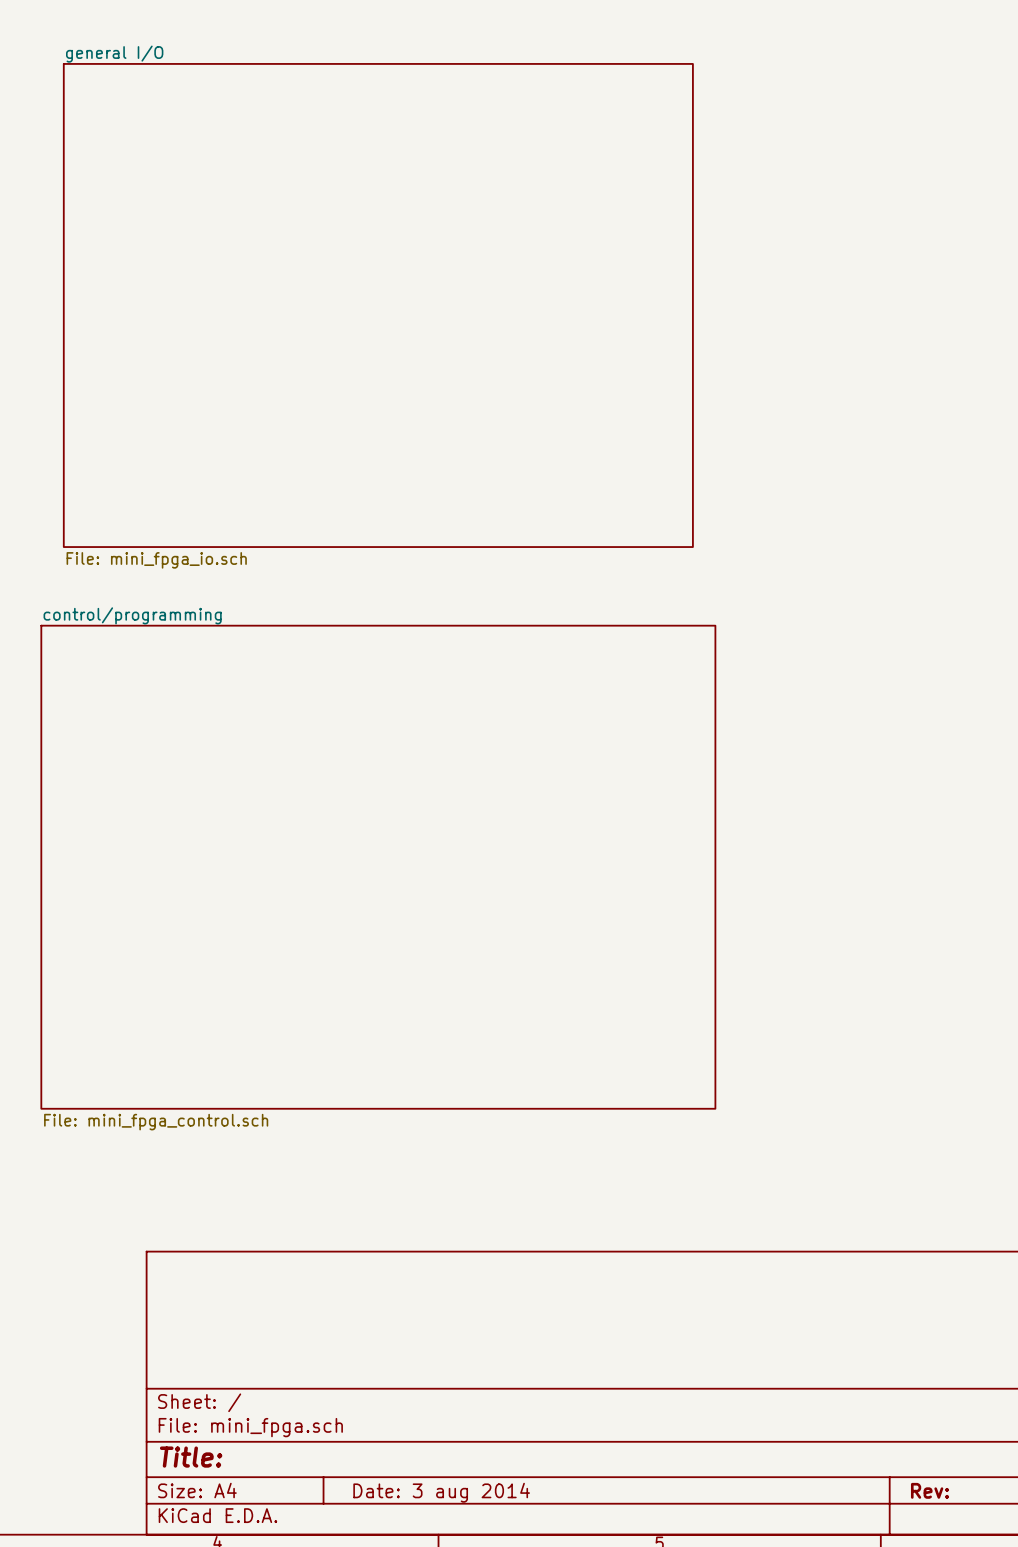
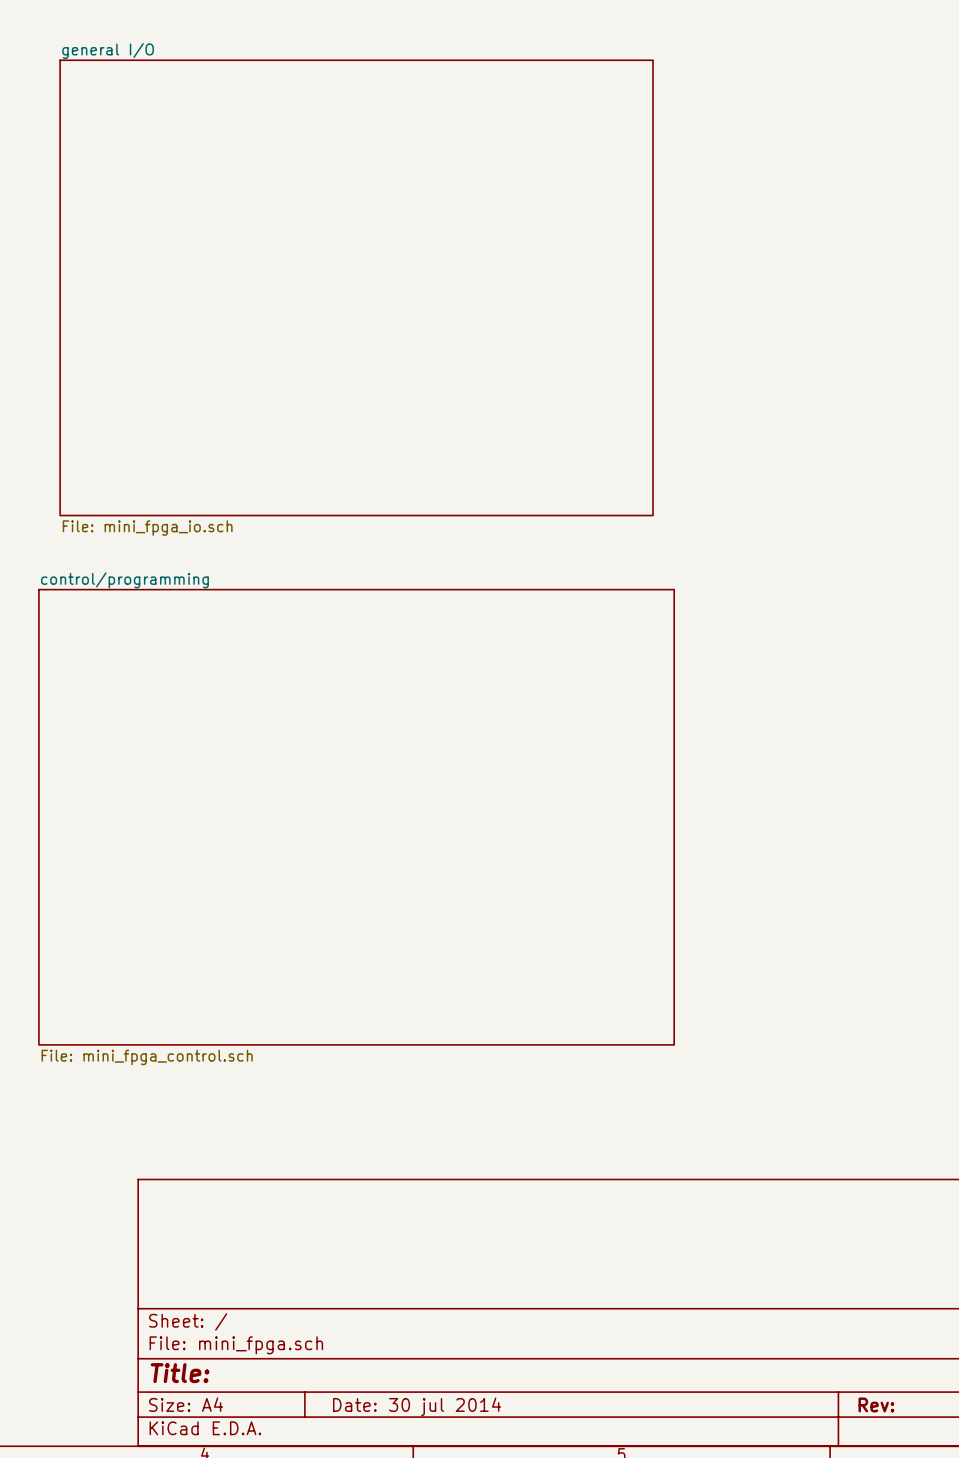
title block: Date: 3 aug 2014 (441, 1492) -> Date: 30 jul 2014 (417, 1406)

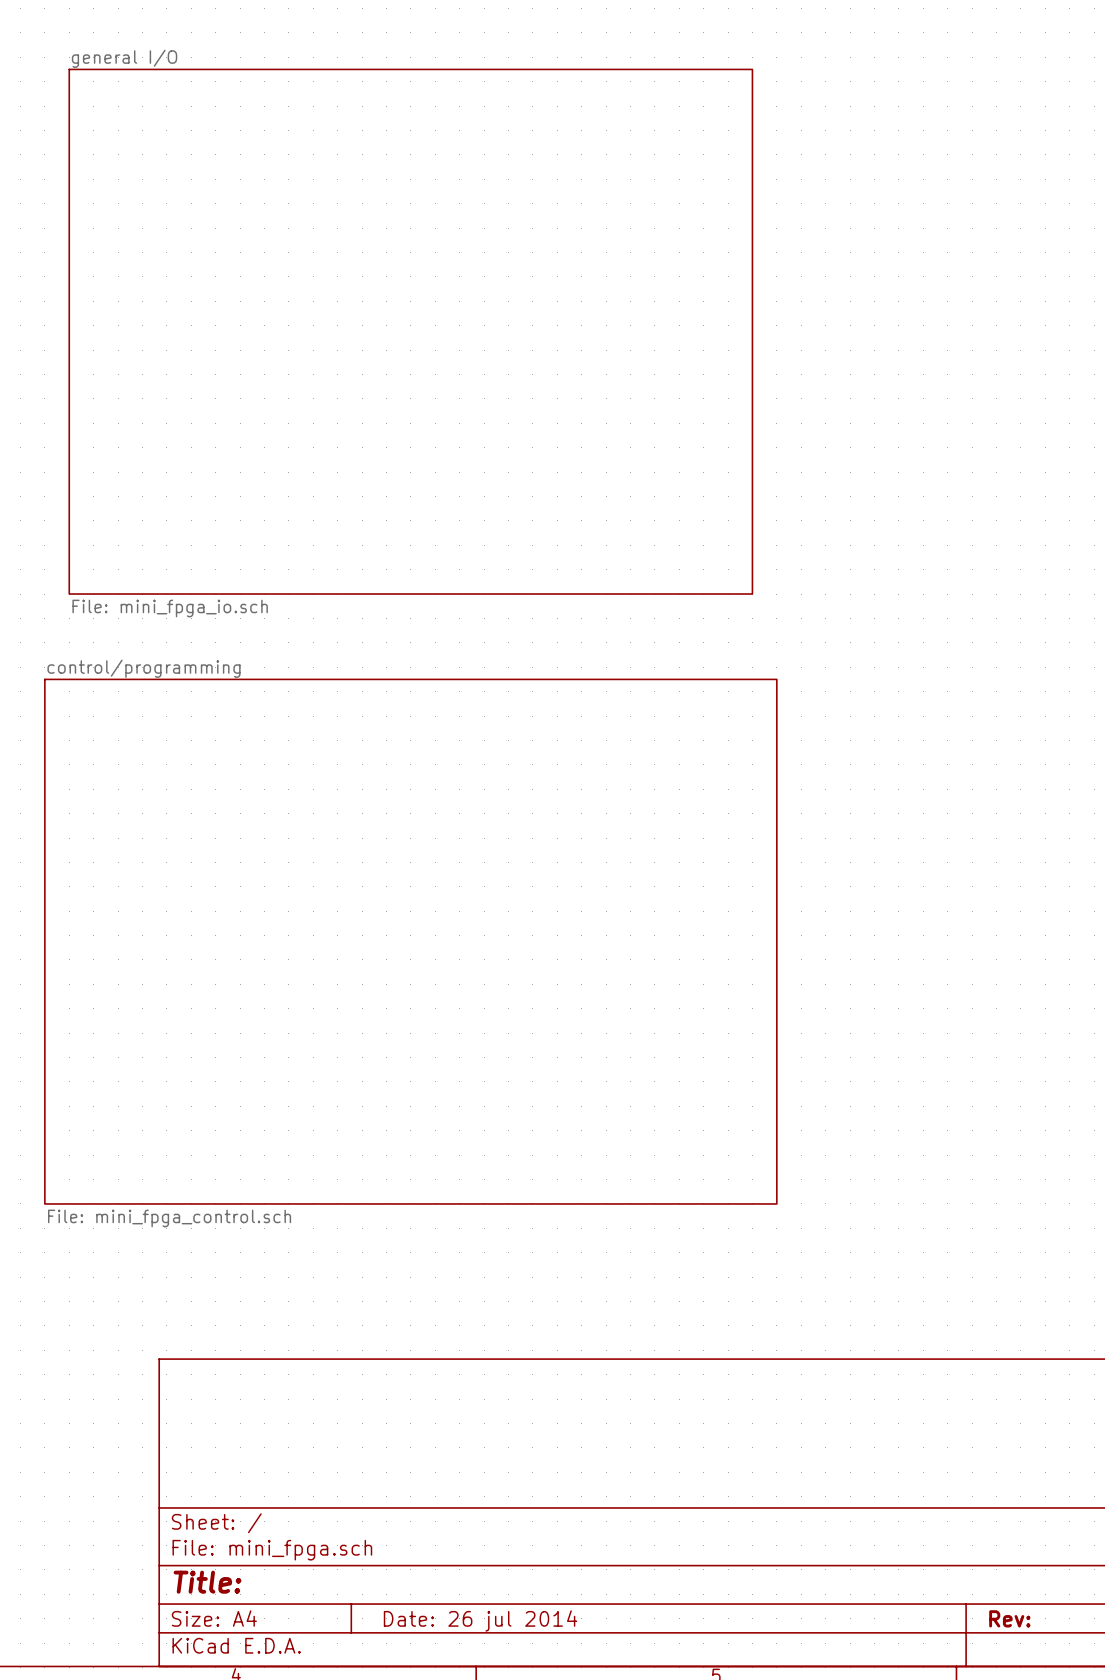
title block: Date: 30 jul 2014 (417, 1406) -> Date: 26 jul 2014 (480, 1620)

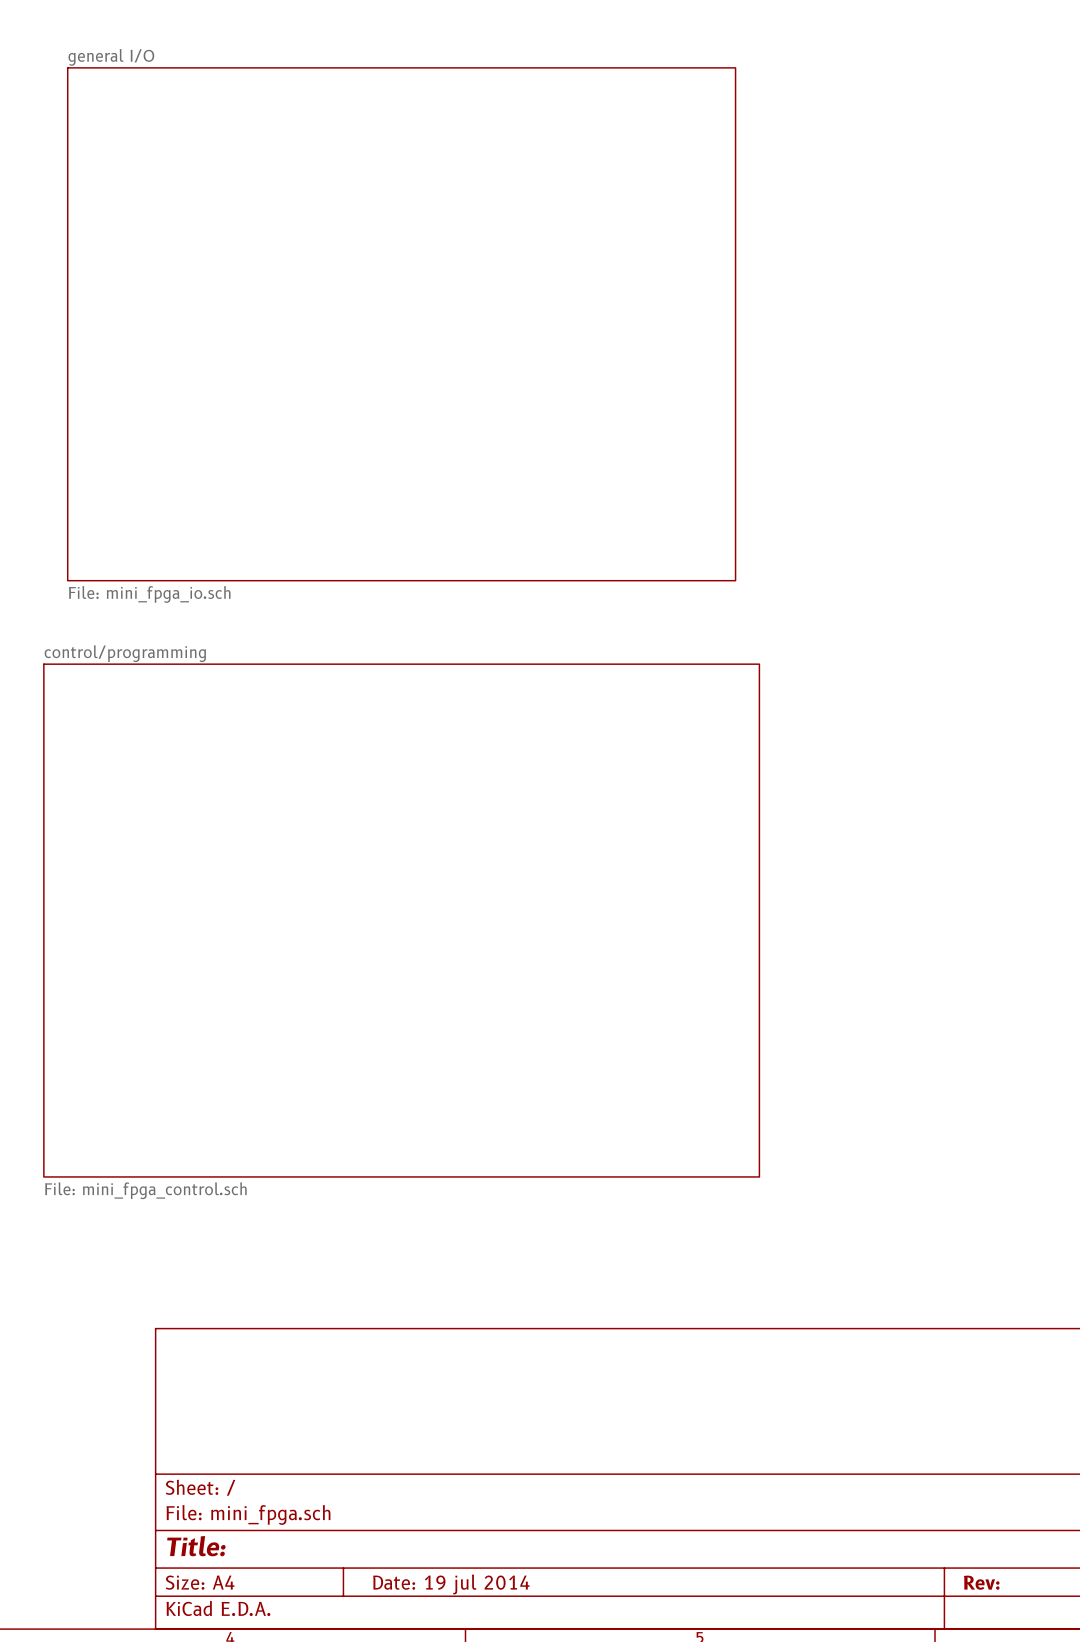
title block: Date: 26 jul 2014 (480, 1620) -> Date: 19 jul 2014 (451, 1584)

